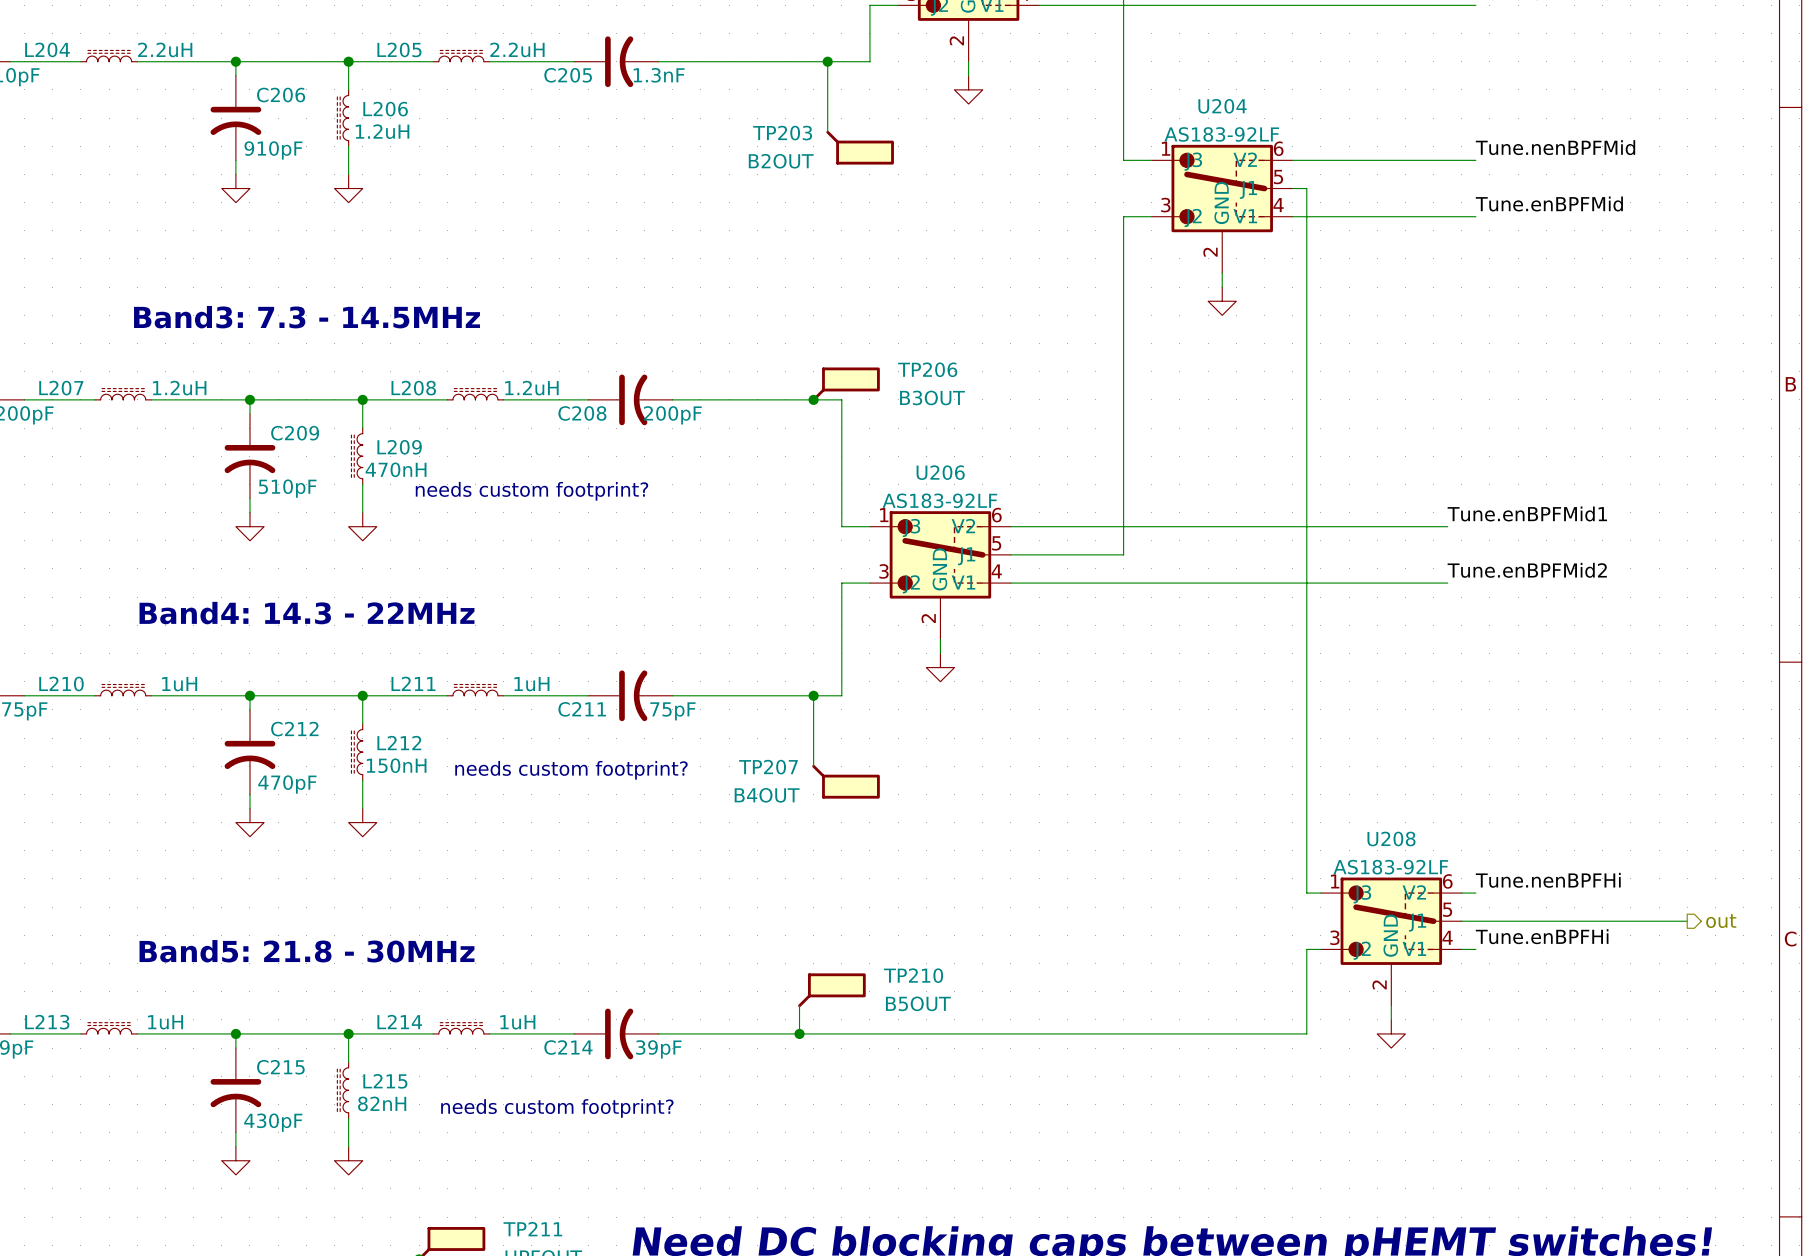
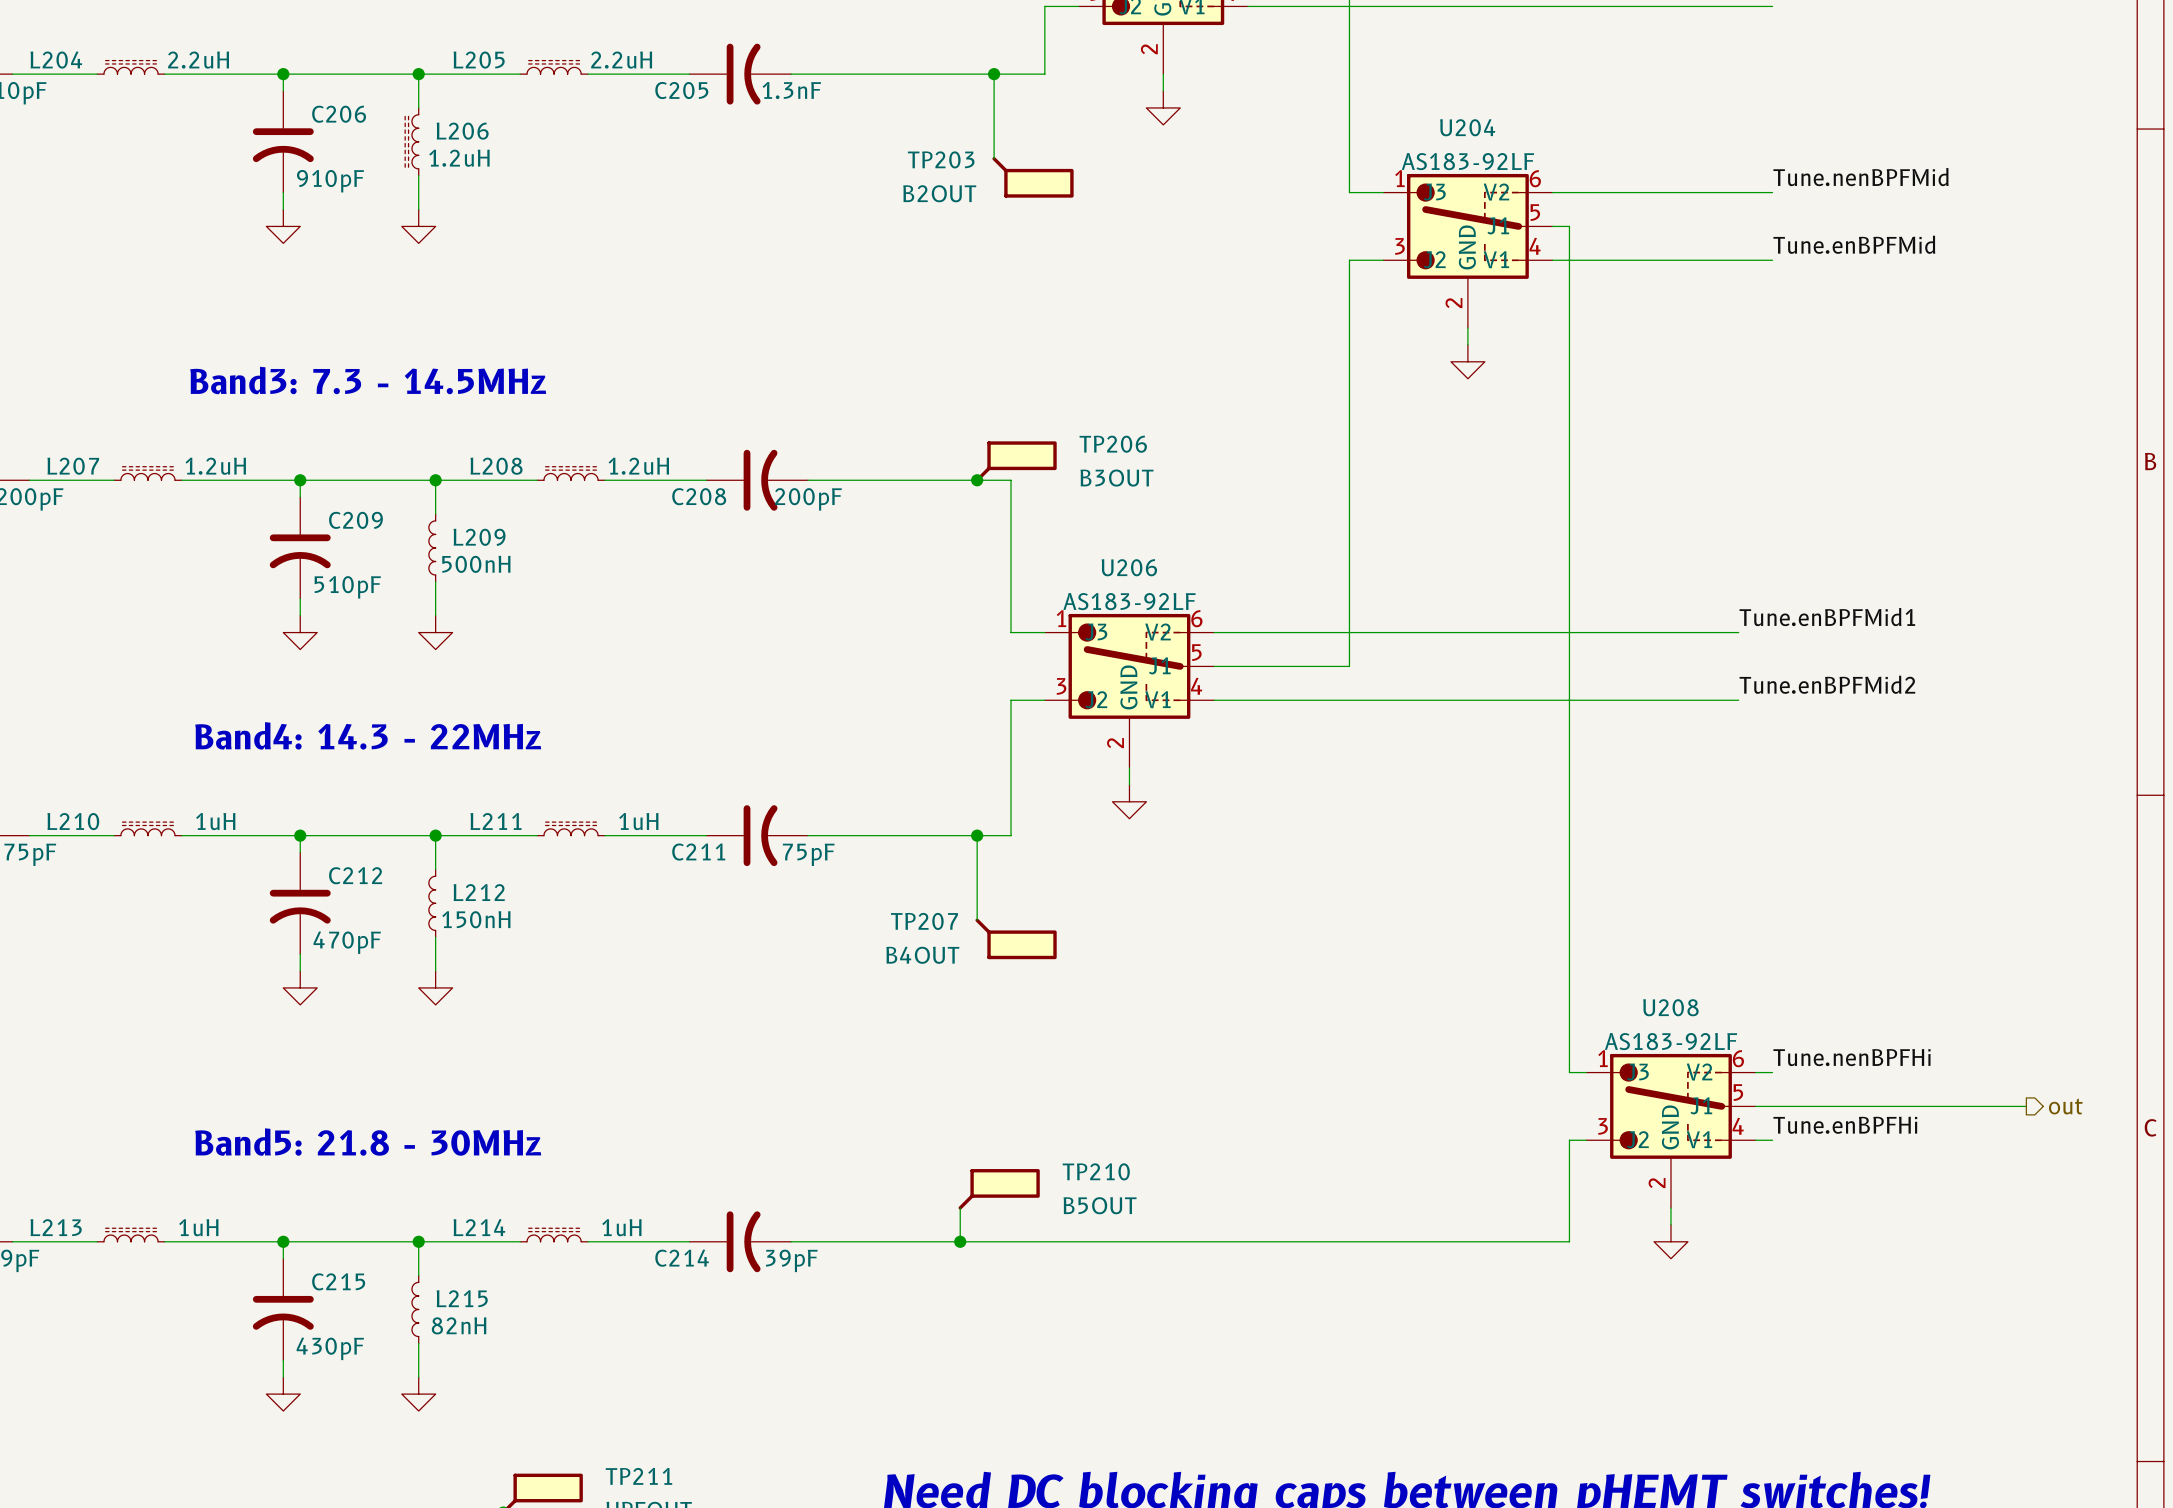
L209 symbol: [351, 428, 363, 485] -> [428, 514, 436, 582]
L209 value: 470nH (396, 469) -> 500nH (476, 564)
text: needs custom footprint? (532, 491) -> none
L212 symbol: [351, 723, 363, 781] -> [428, 869, 436, 938]
text: needs custom footprint? (571, 770) -> none
L215 symbol: [337, 1062, 349, 1119] -> [411, 1275, 419, 1344]
text: needs custom footprint? (557, 1108) -> none

